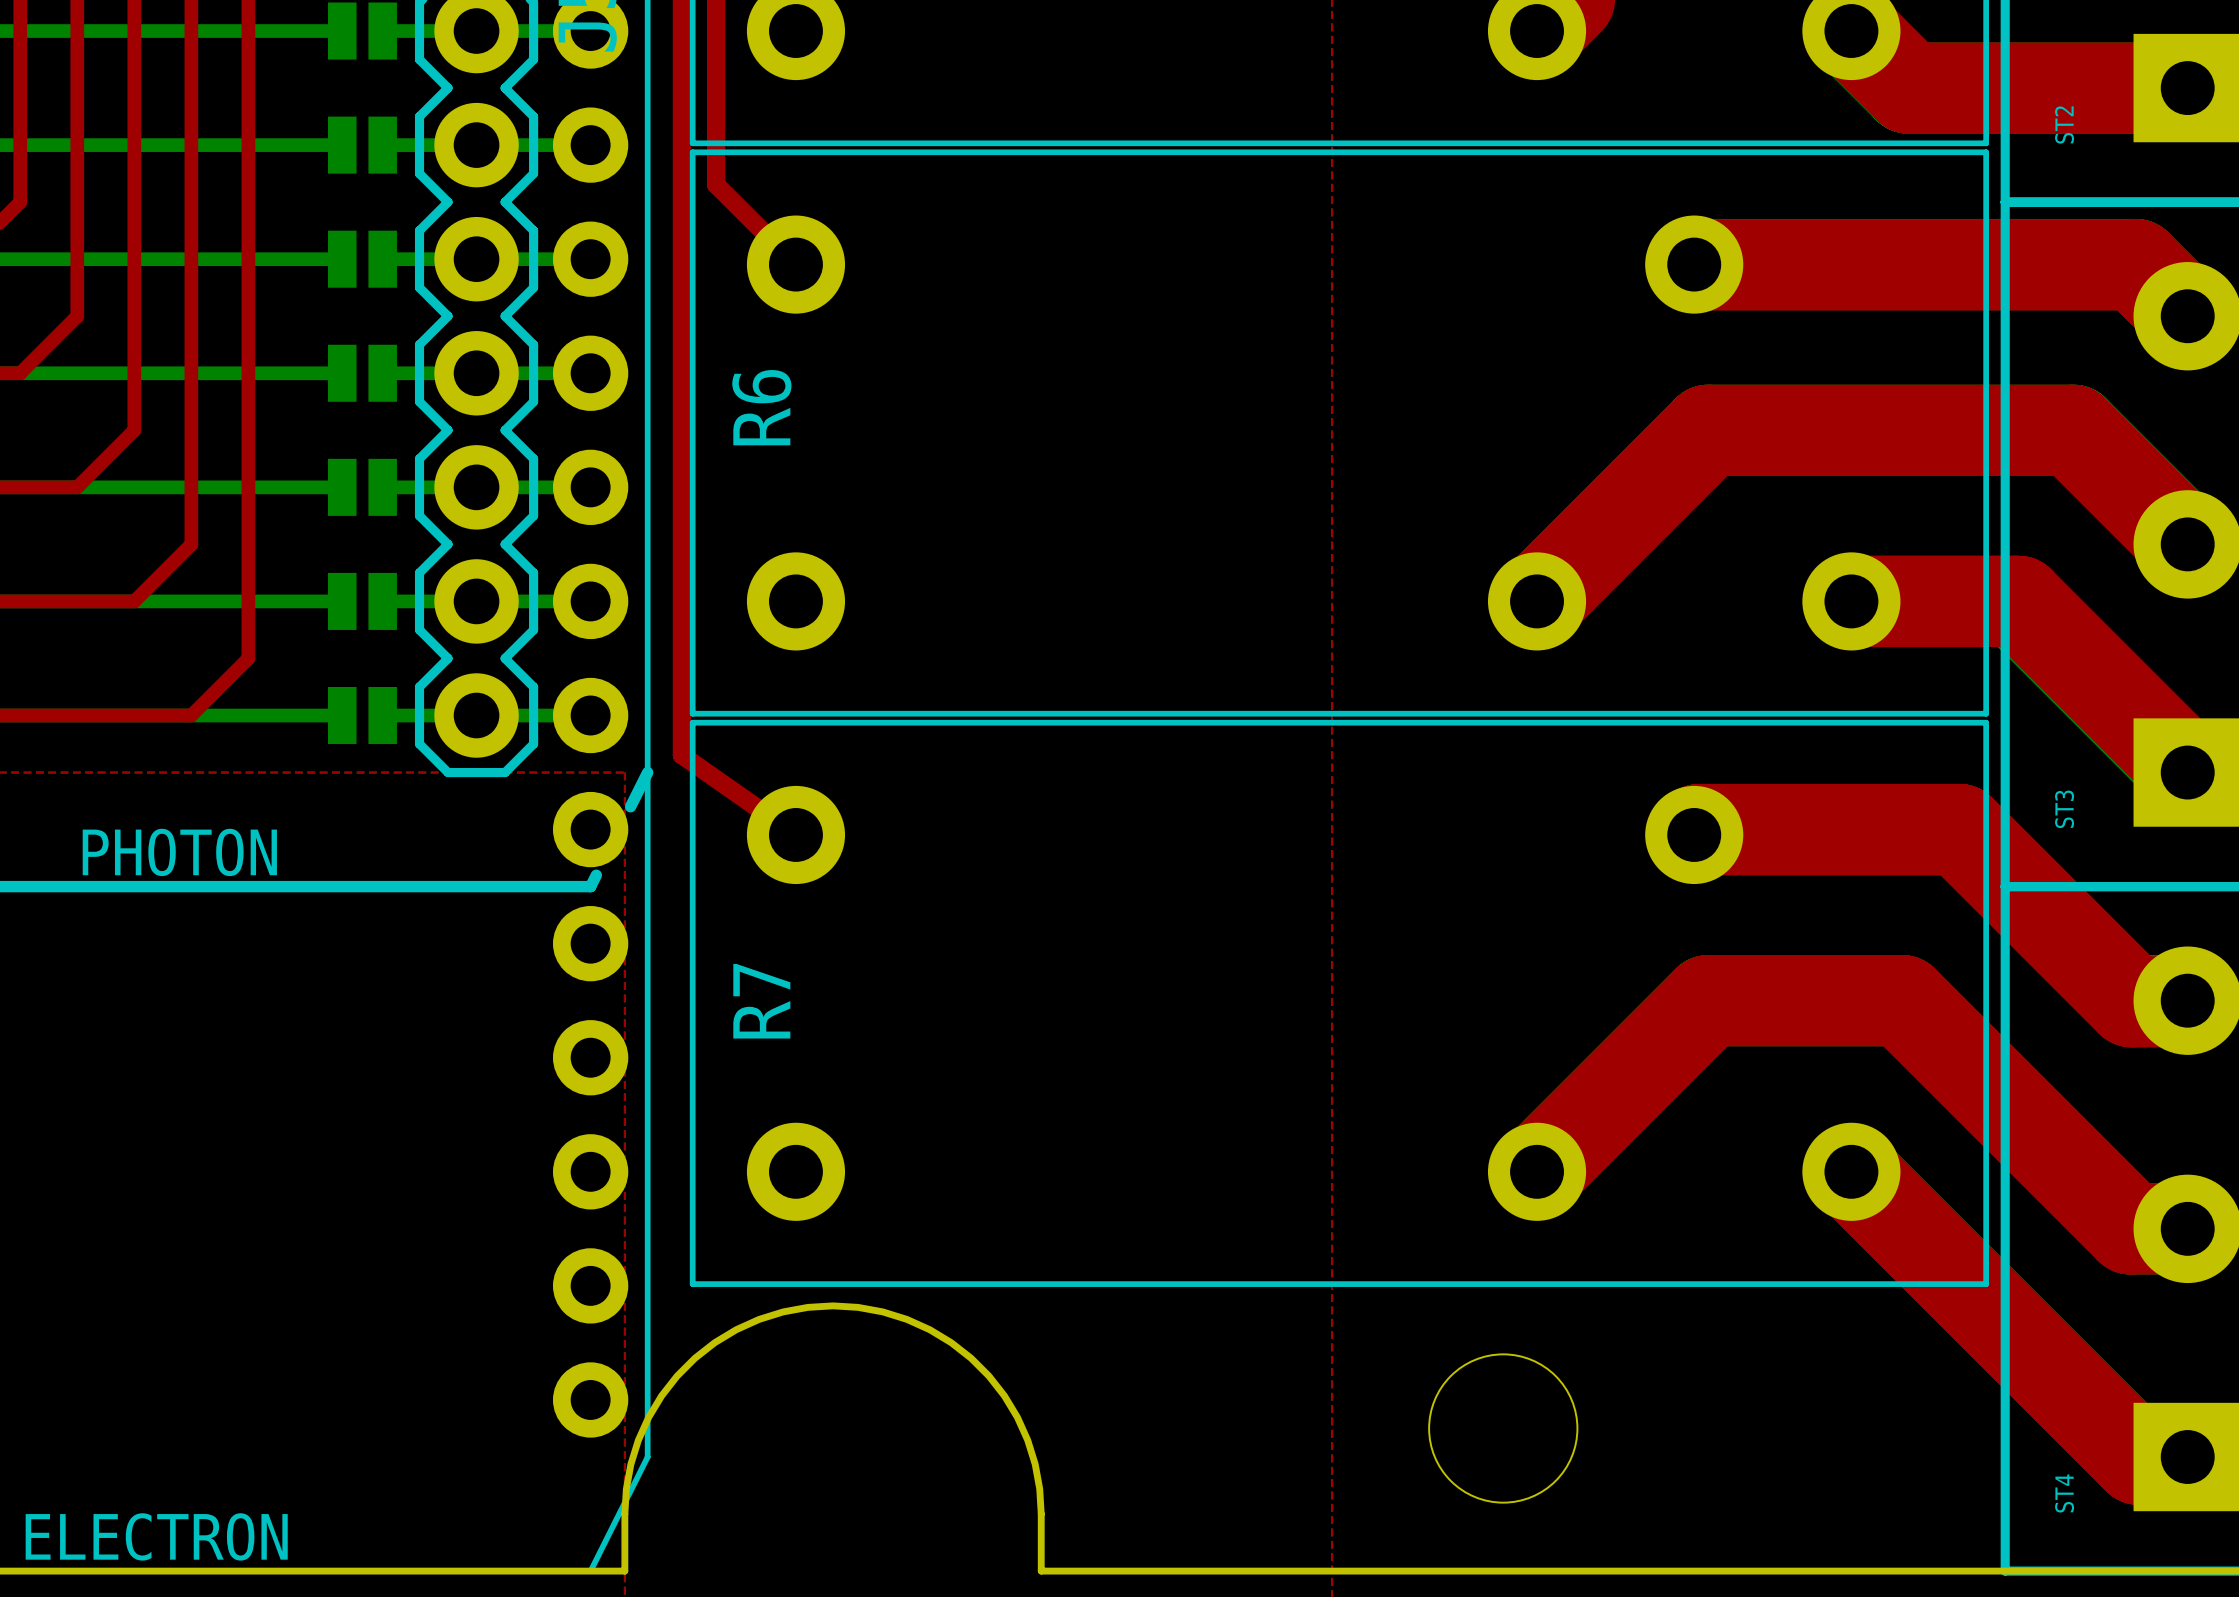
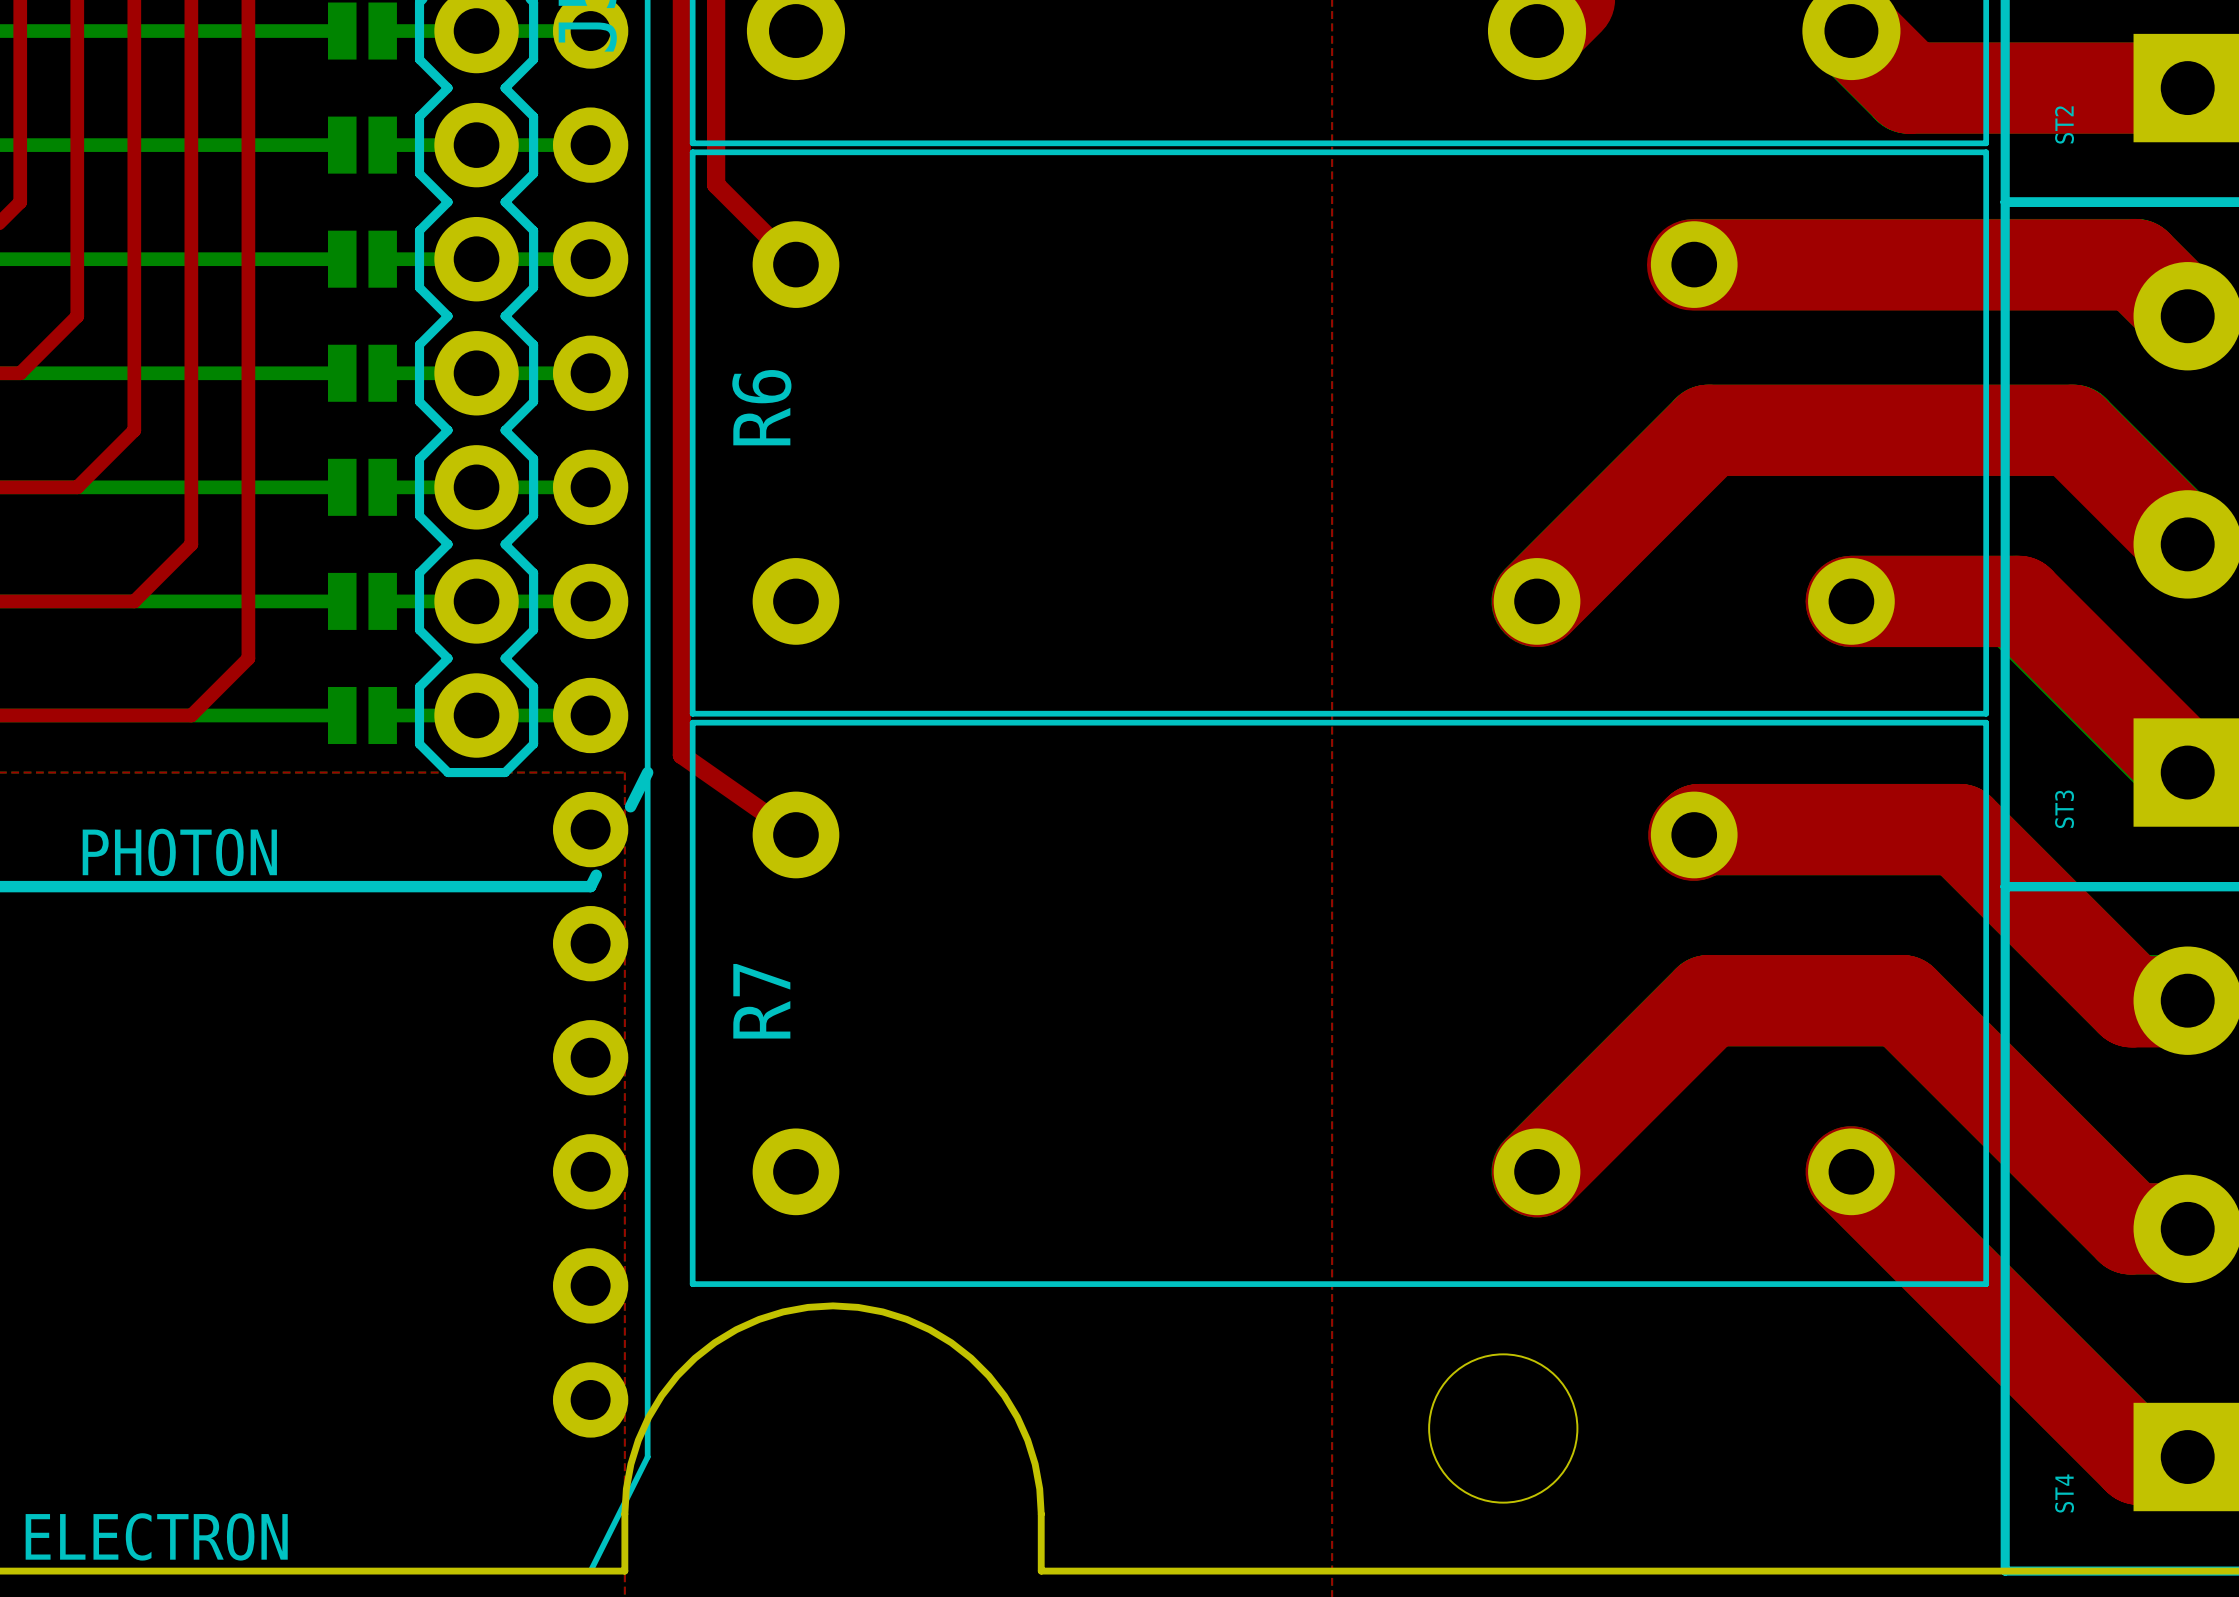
R6 footprint: [689, 149, 1990, 717] -> [689, 149, 1990, 717]
R7 footprint: [689, 719, 1990, 1287] -> [689, 719, 1990, 1287]

